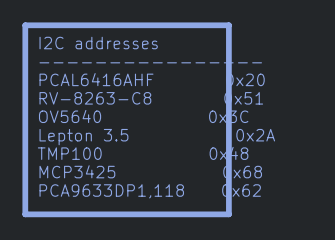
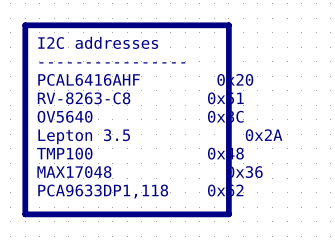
text: MCP3425 0x68 (150, 171) -> MAX17048 0x36 (150, 172)

